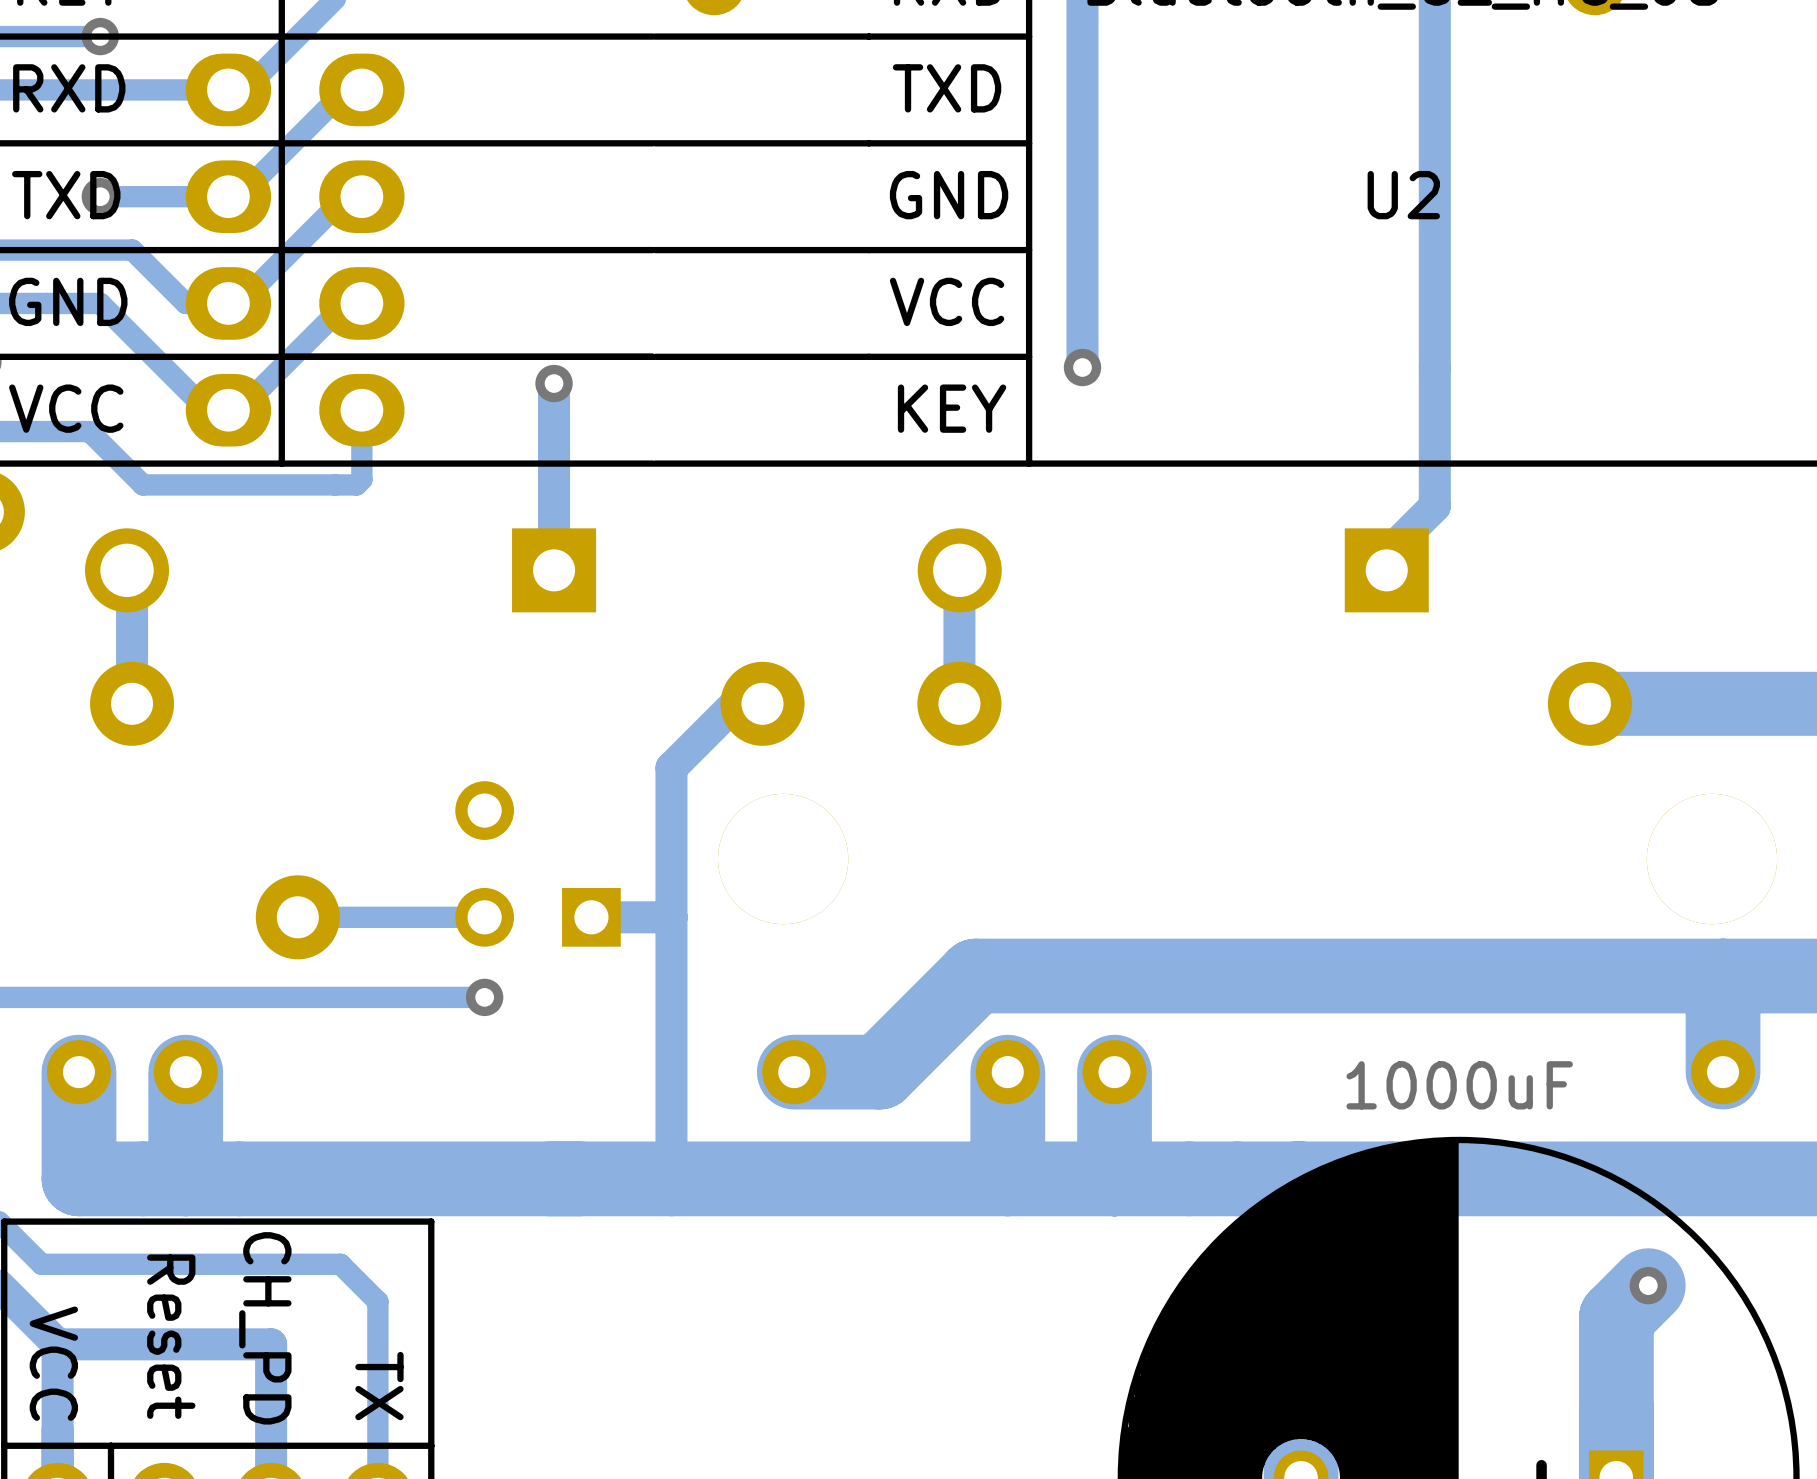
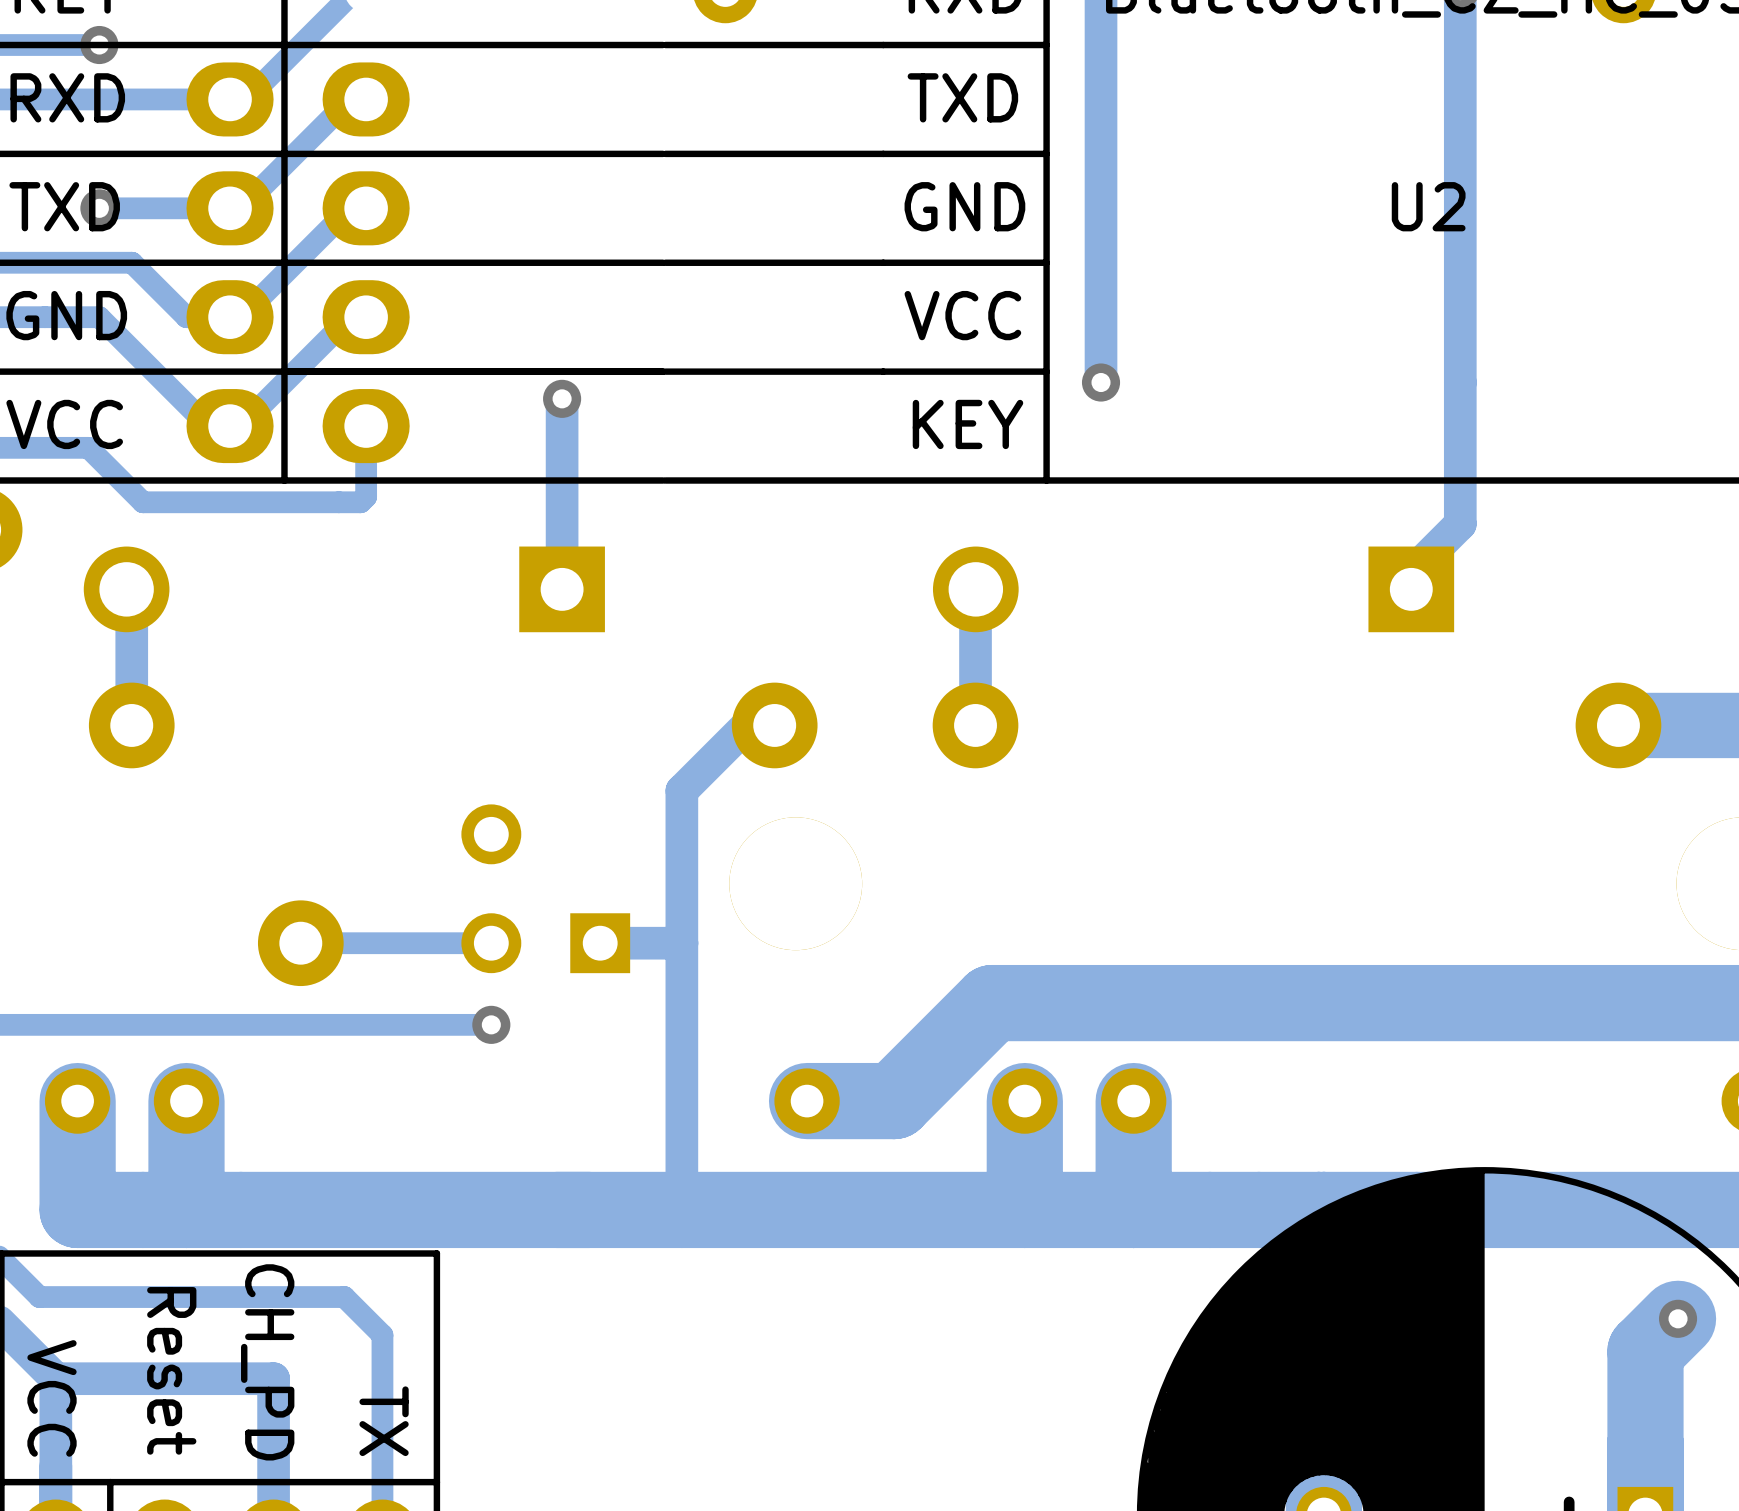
part value: 1000uF (1459, 1085) -> none

